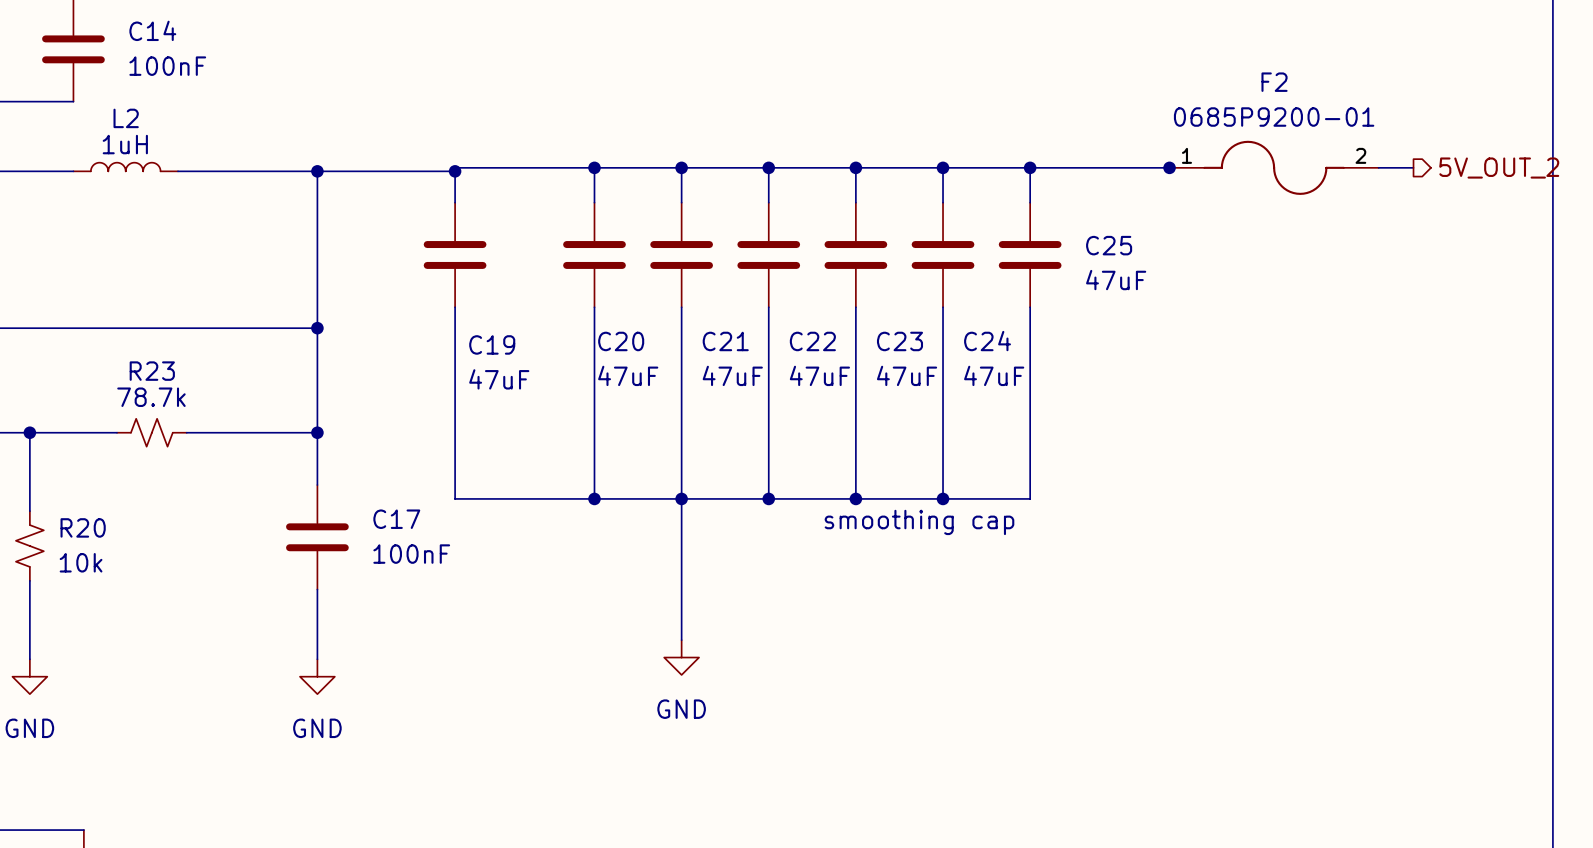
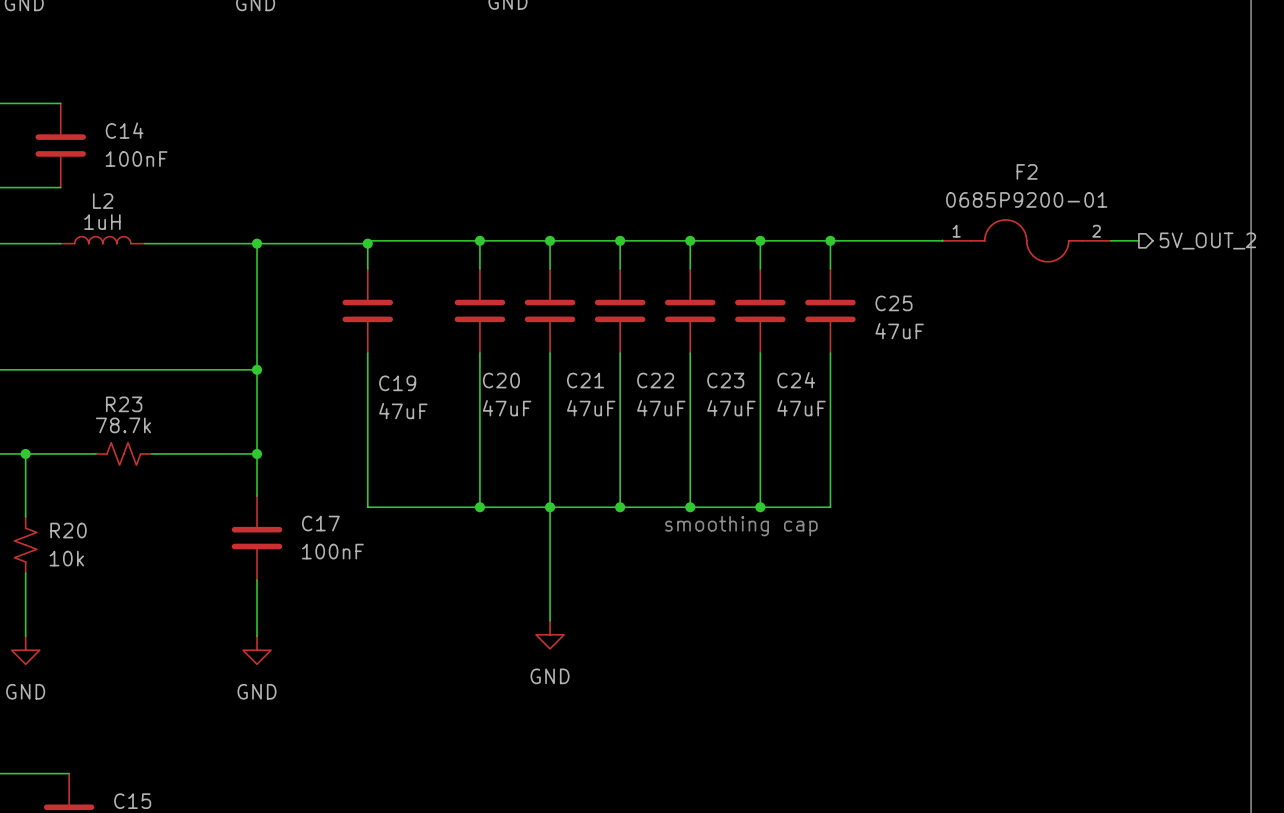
junction: (1169, 167) -> none

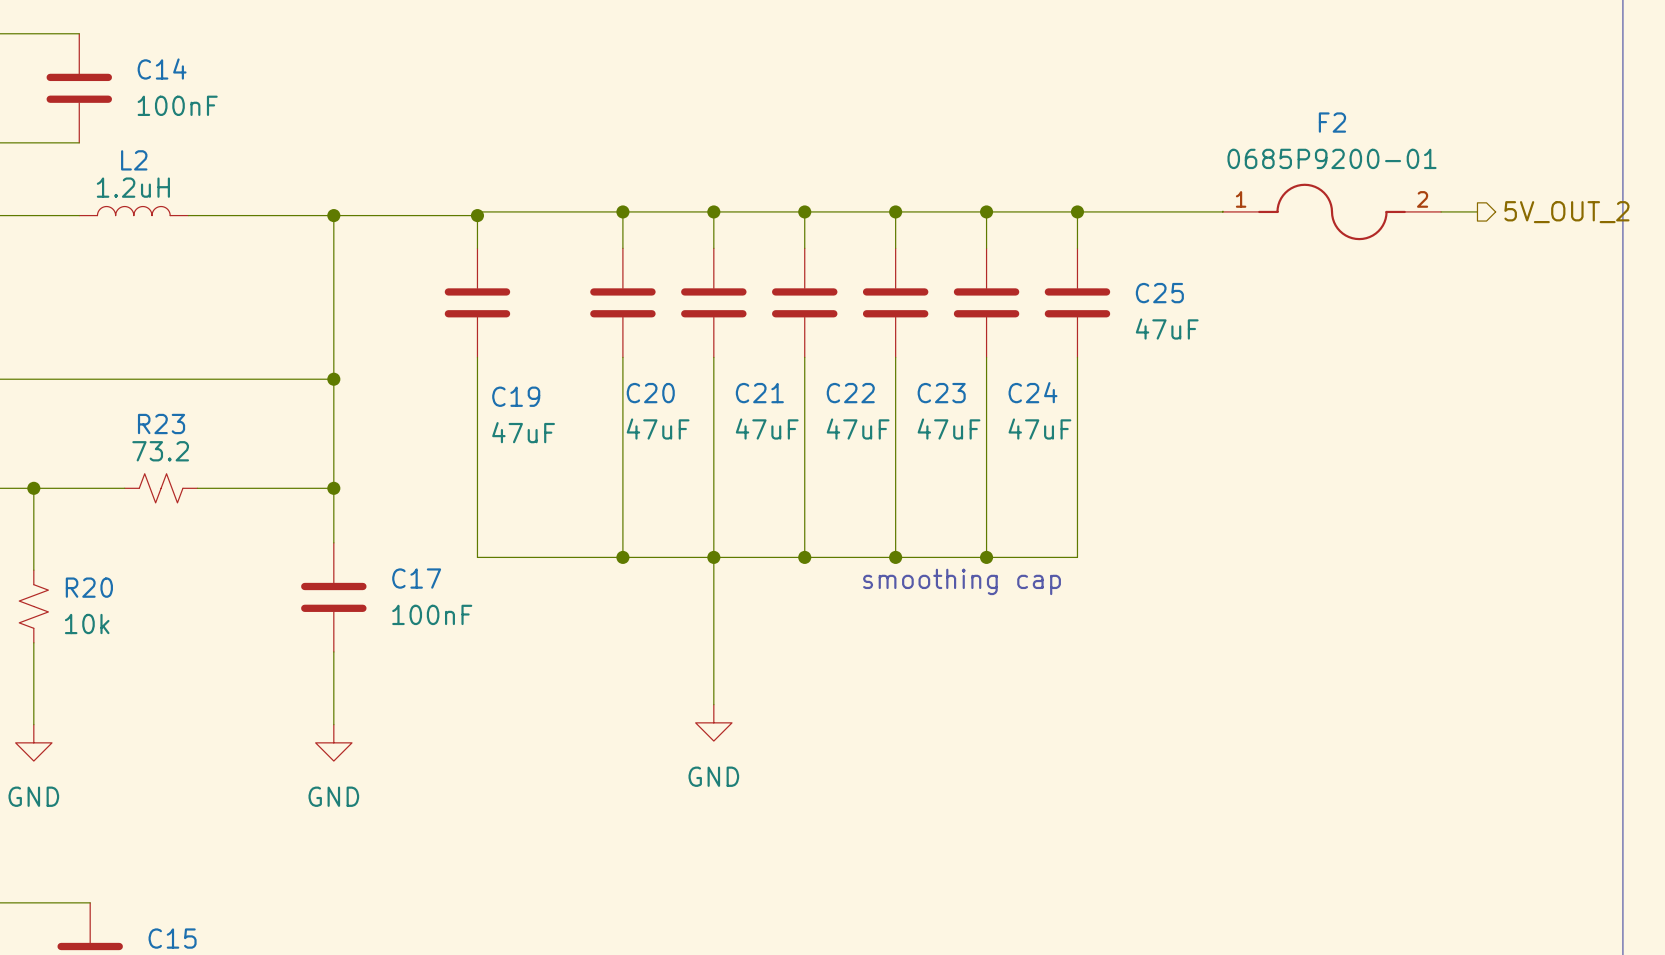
L2 value: 1uH (102, 222) -> 1.2uH (133, 187)
R23 value: 78.7k (123, 425) -> 73.2 (160, 451)

